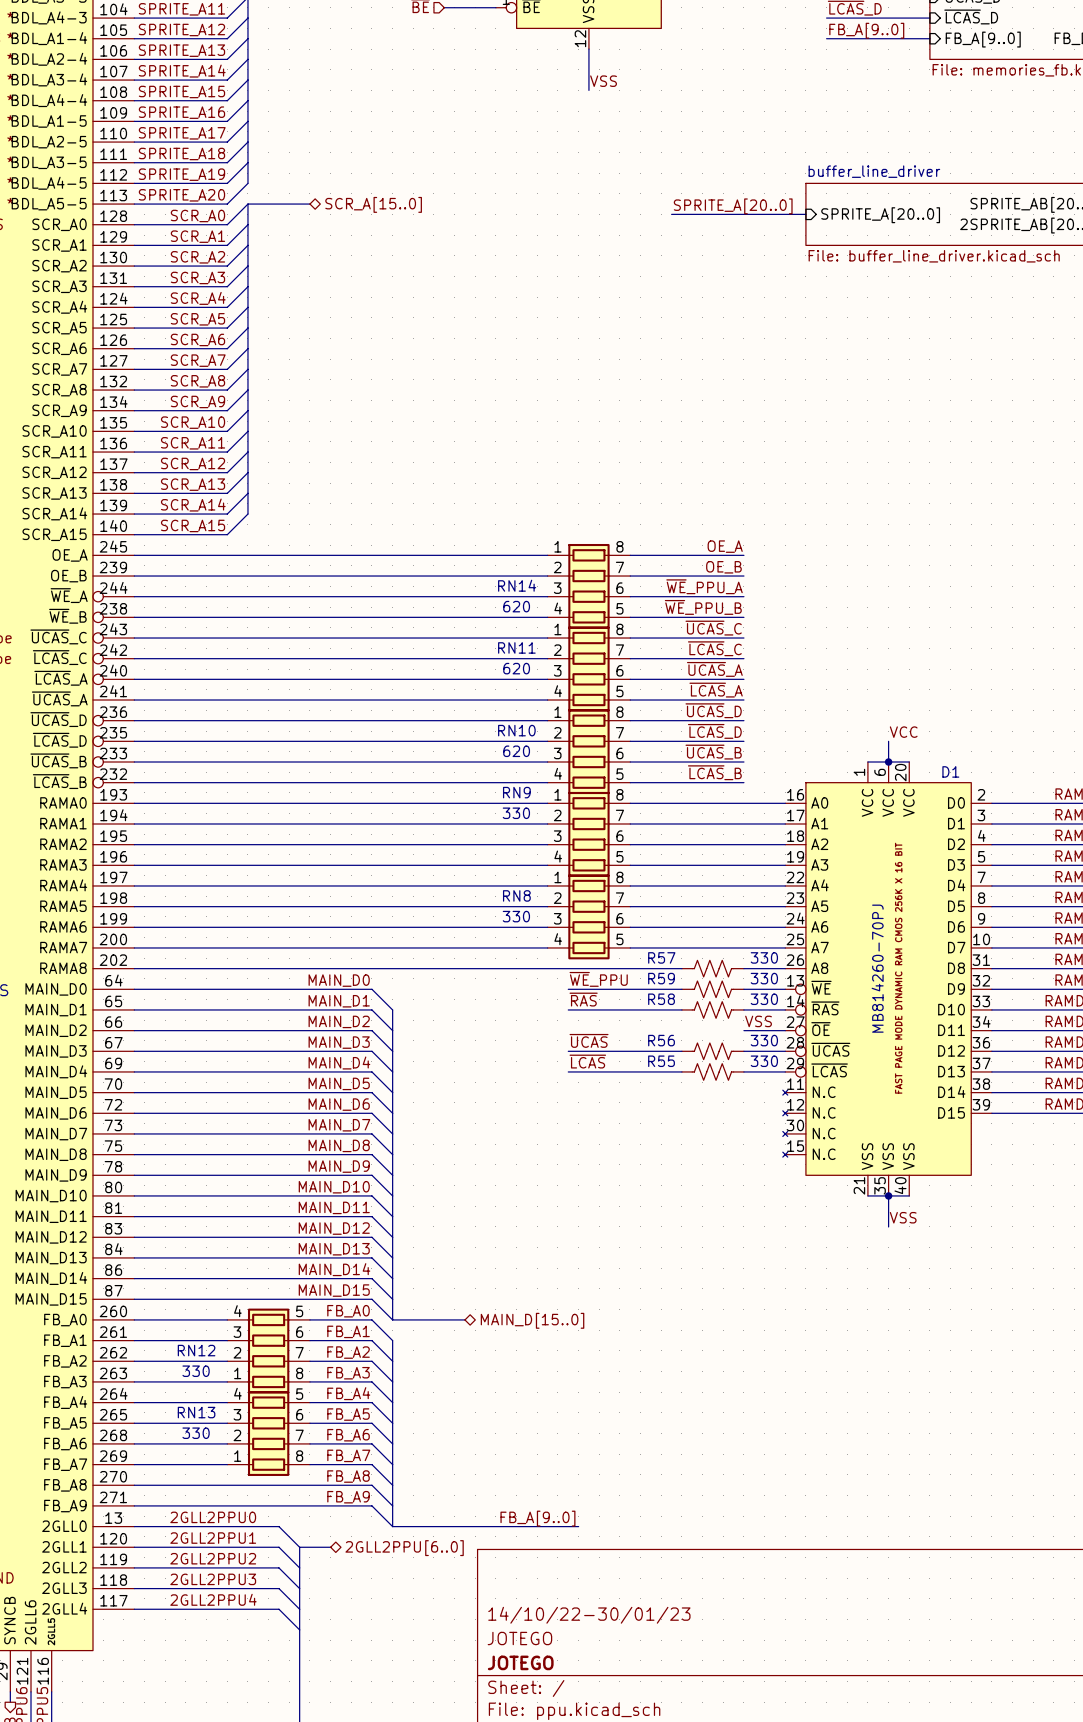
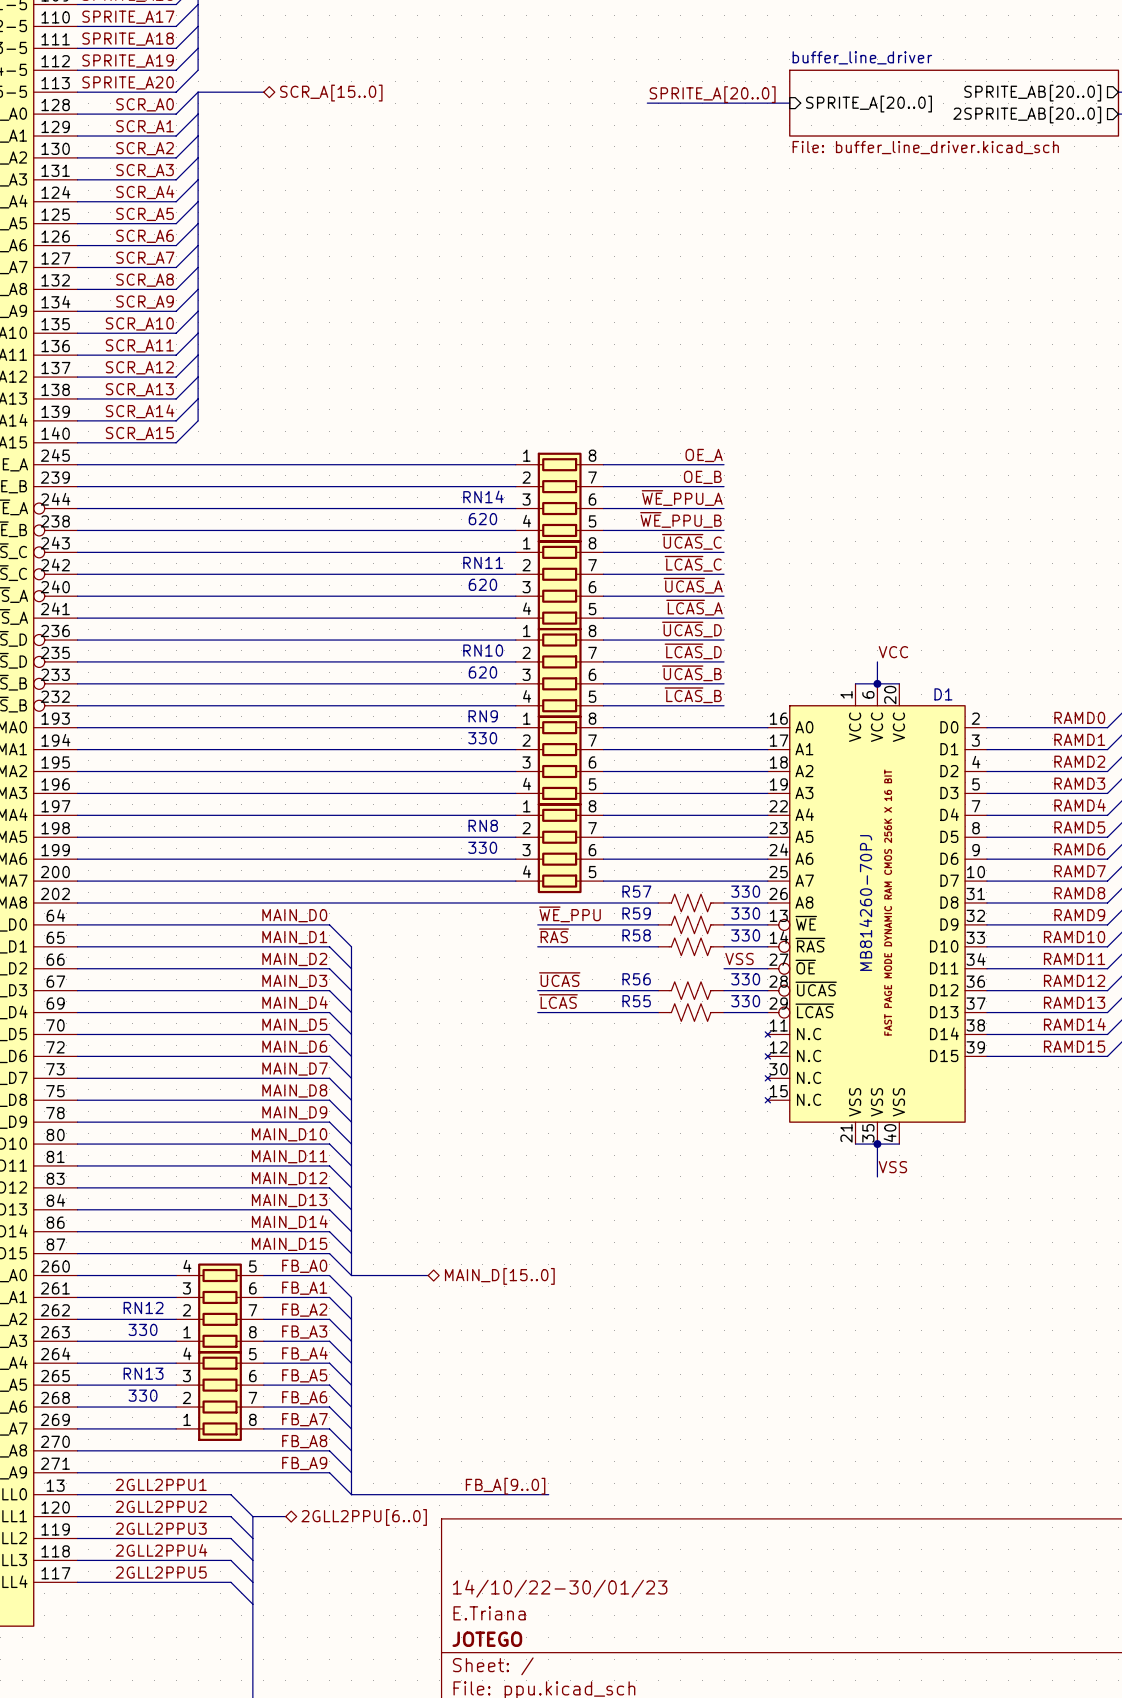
label: 2GLL2PPU0 (213, 1517) -> 2GLL2PPU1 (161, 1484)
label: 2GLL2PPU1 (213, 1538) -> 2GLL2PPU2 (161, 1506)
label: 2GLL2PPU2 (213, 1558) -> 2GLL2PPU3 (161, 1528)
label: 2GLL2PPU3 (213, 1579) -> 2GLL2PPU4 (161, 1550)
label: 2GLL2PPU4 (213, 1599) -> 2GLL2PPU5 (161, 1572)
title block: JOTEGO (519, 1638) -> E.Triana (489, 1613)

